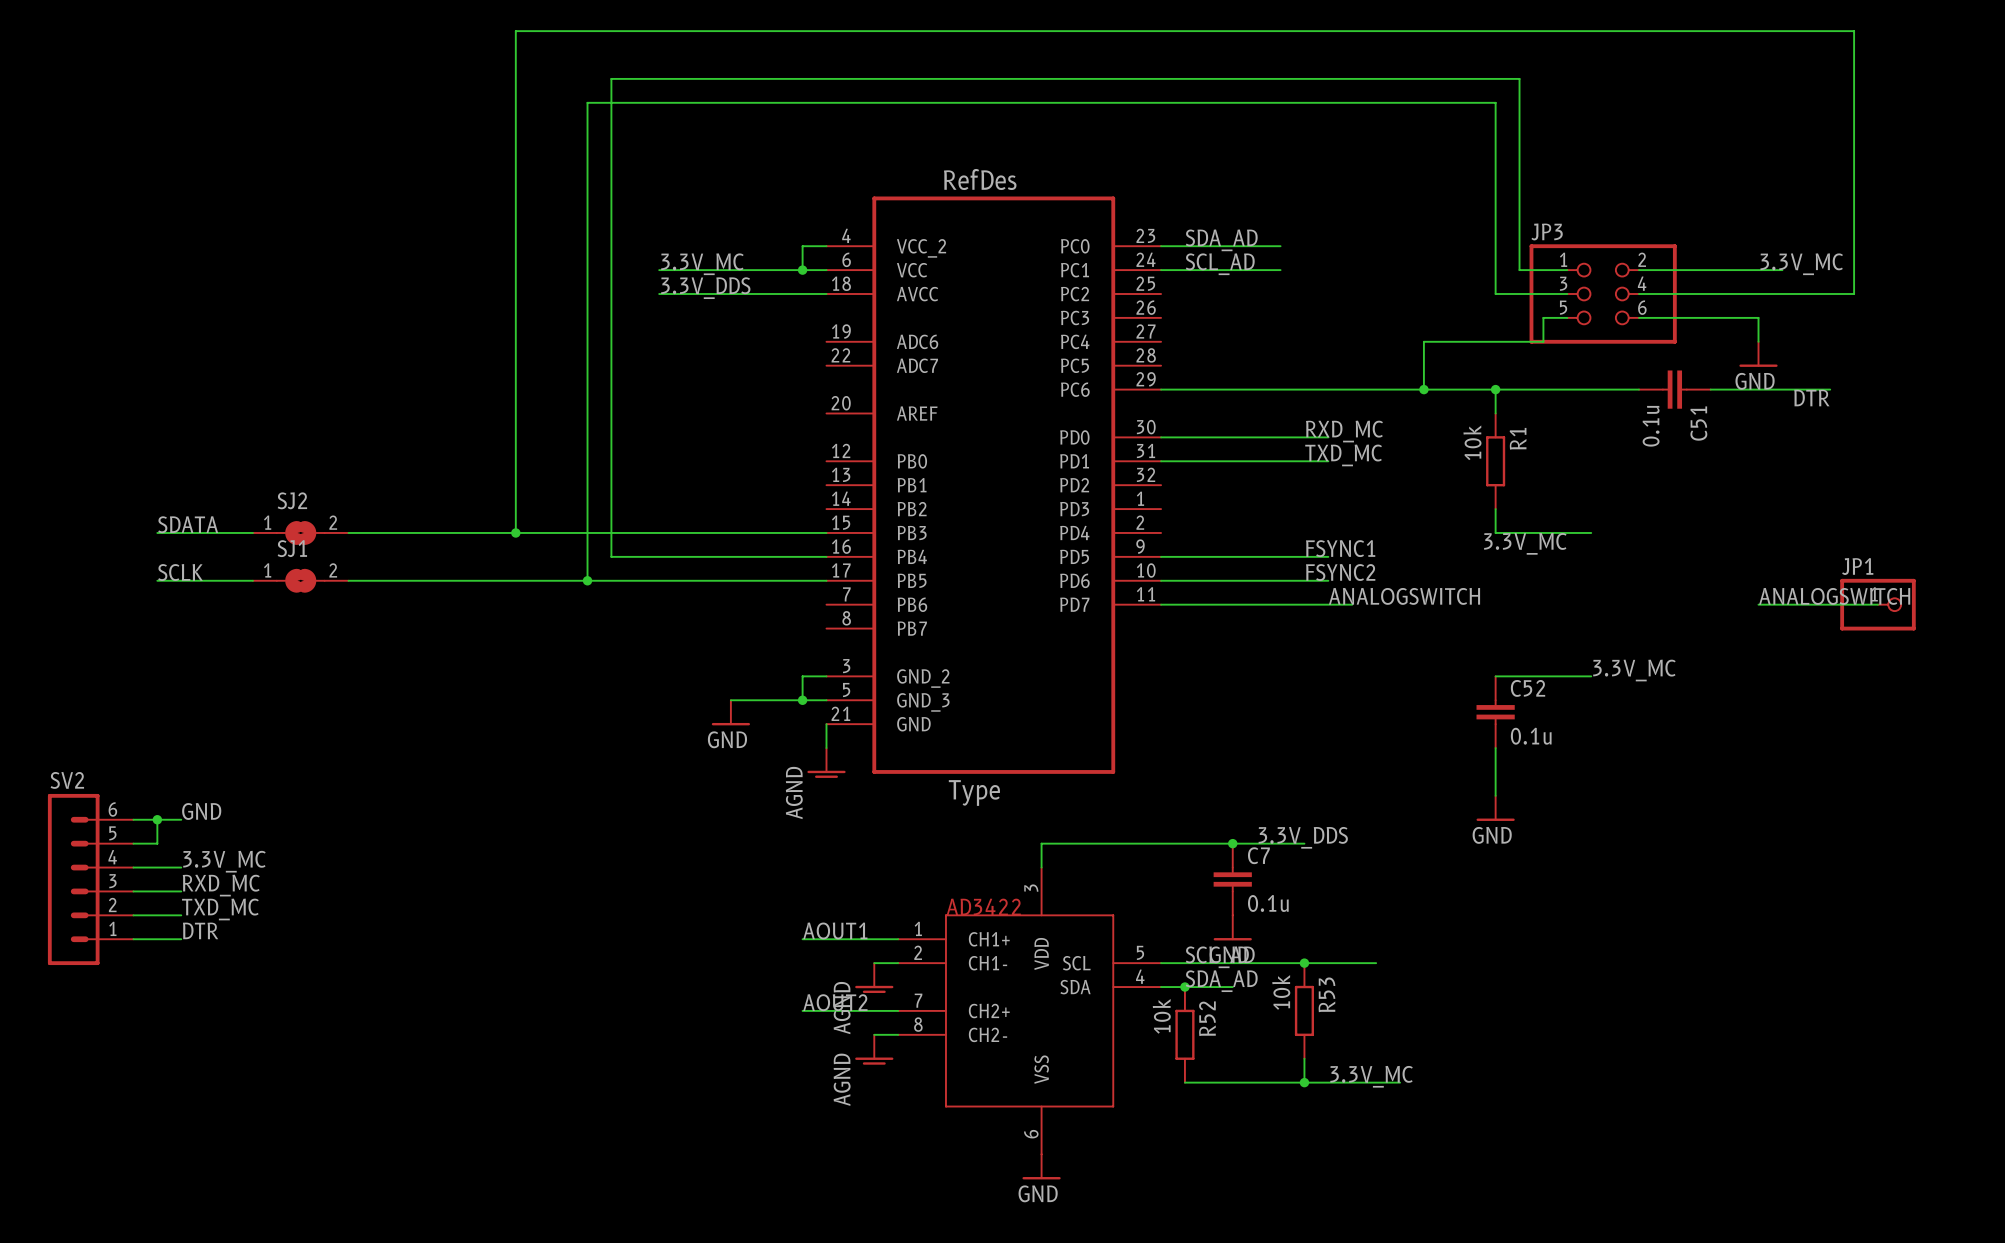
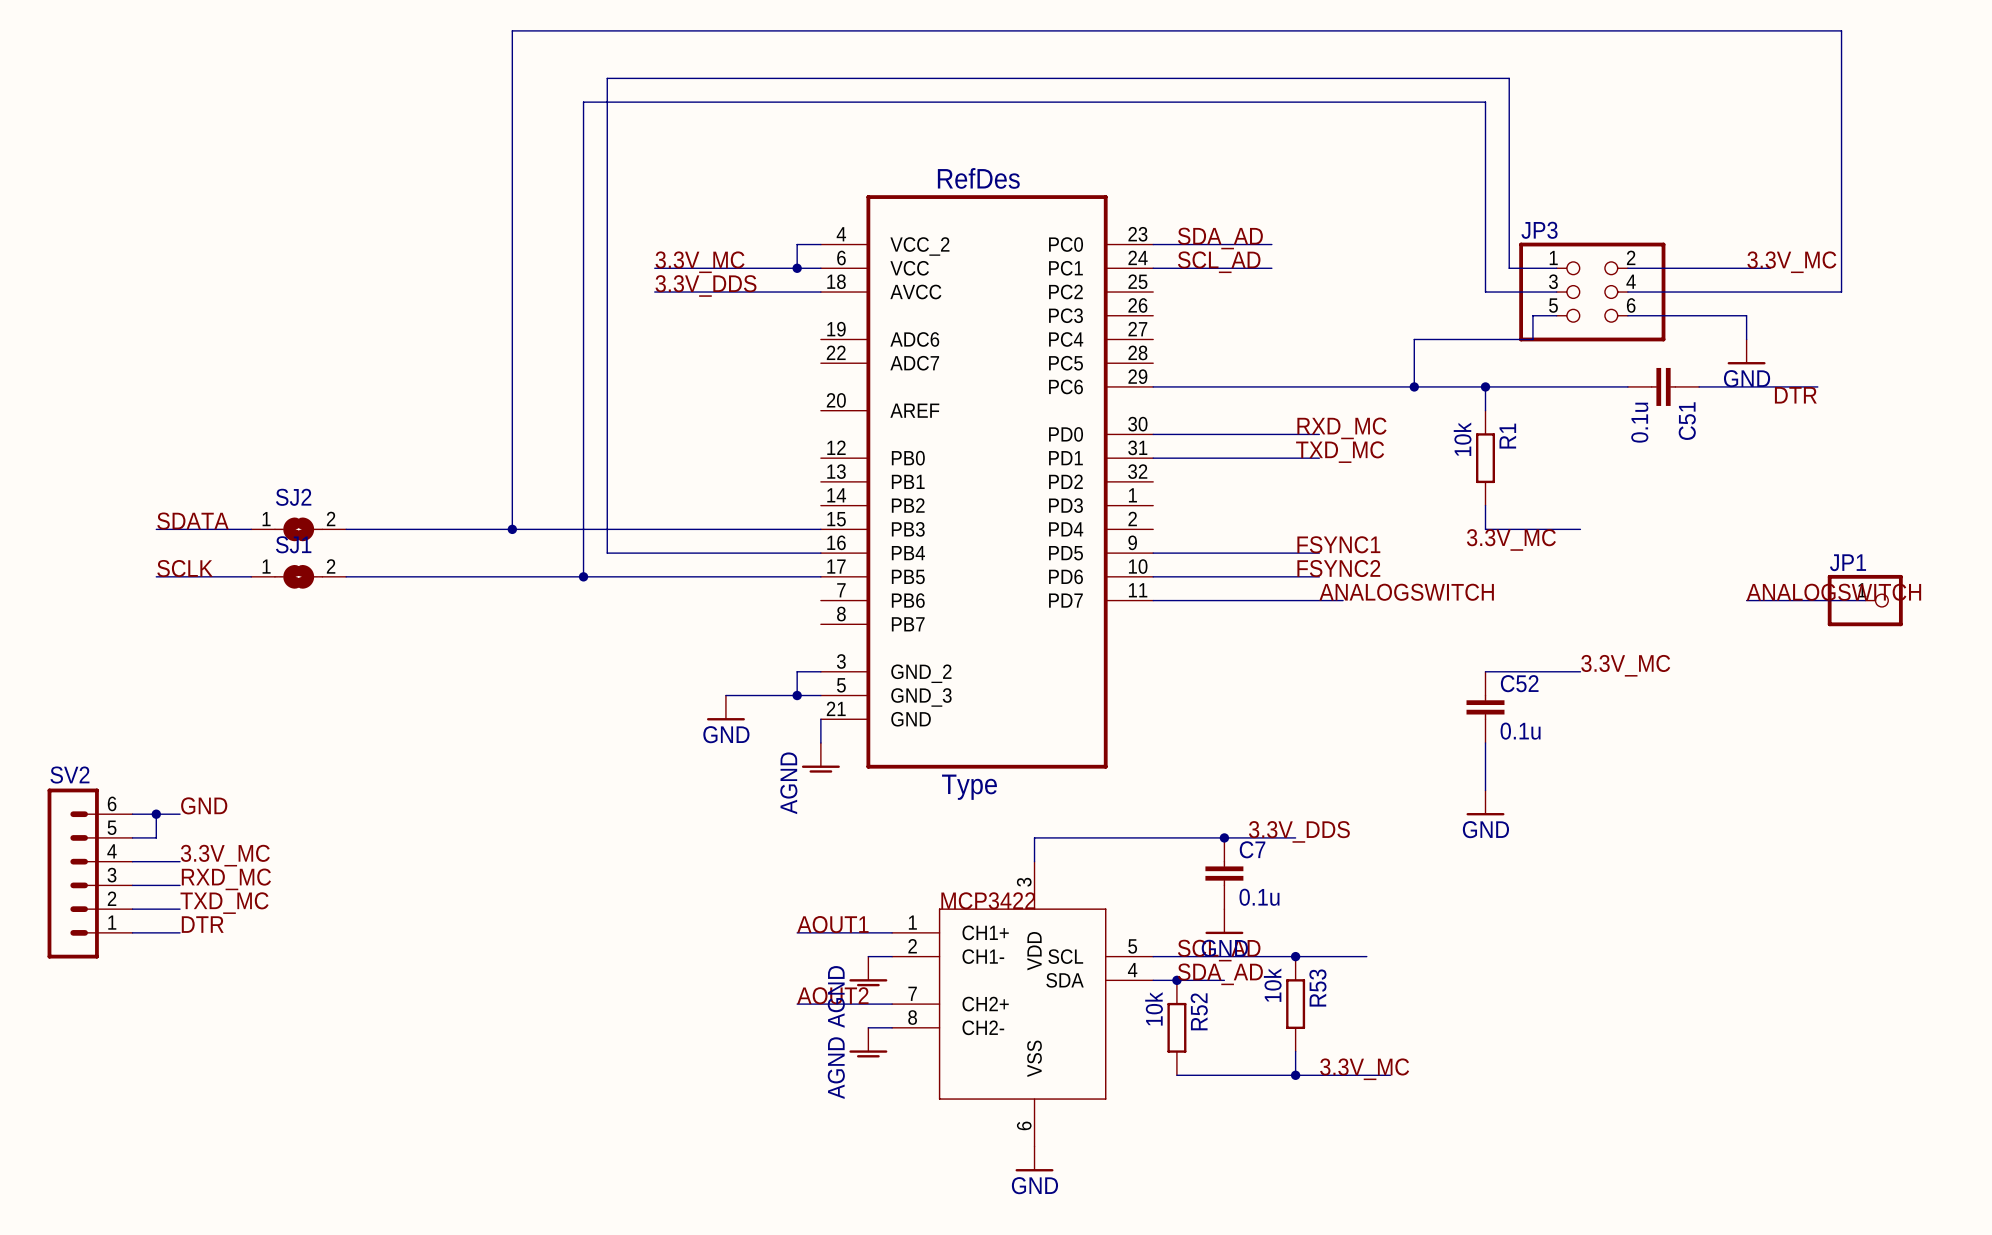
part text: AD3422 (983, 906) -> MCP3422 (988, 900)

